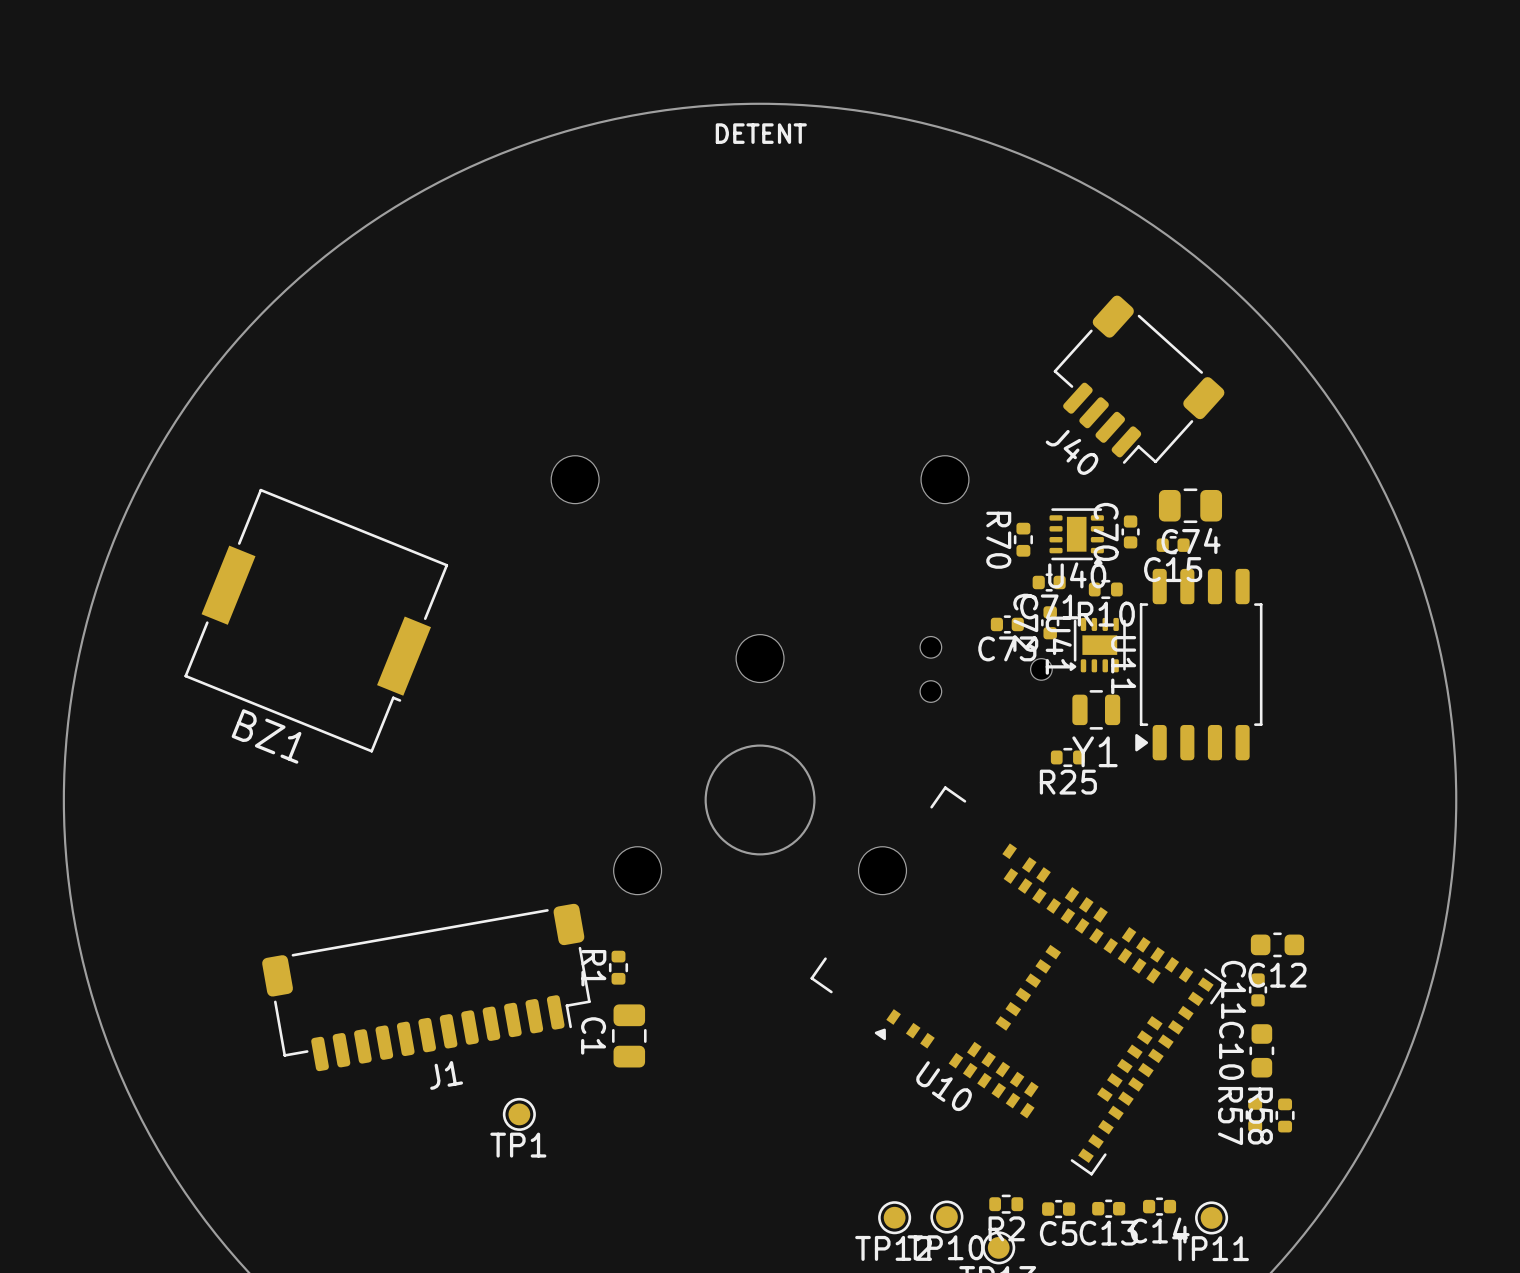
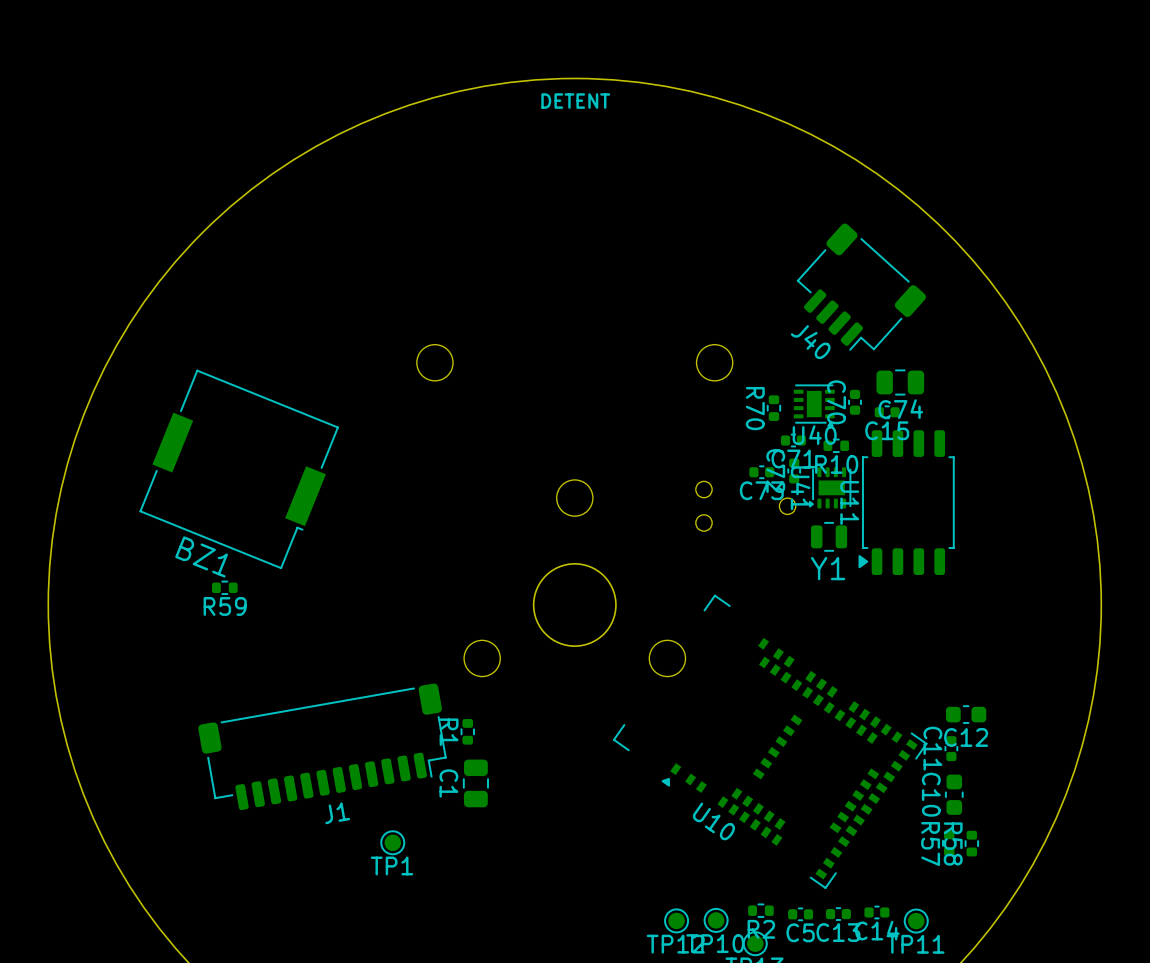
R25: (1067, 757) -> none
R59: none -> (224, 587)

